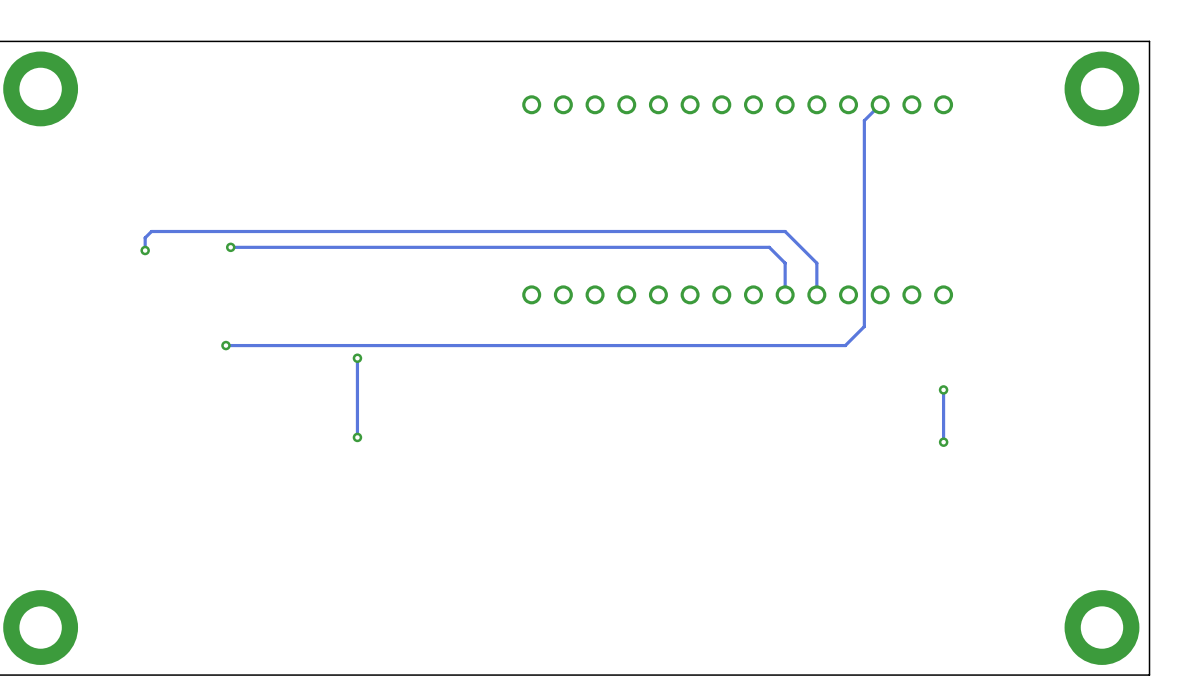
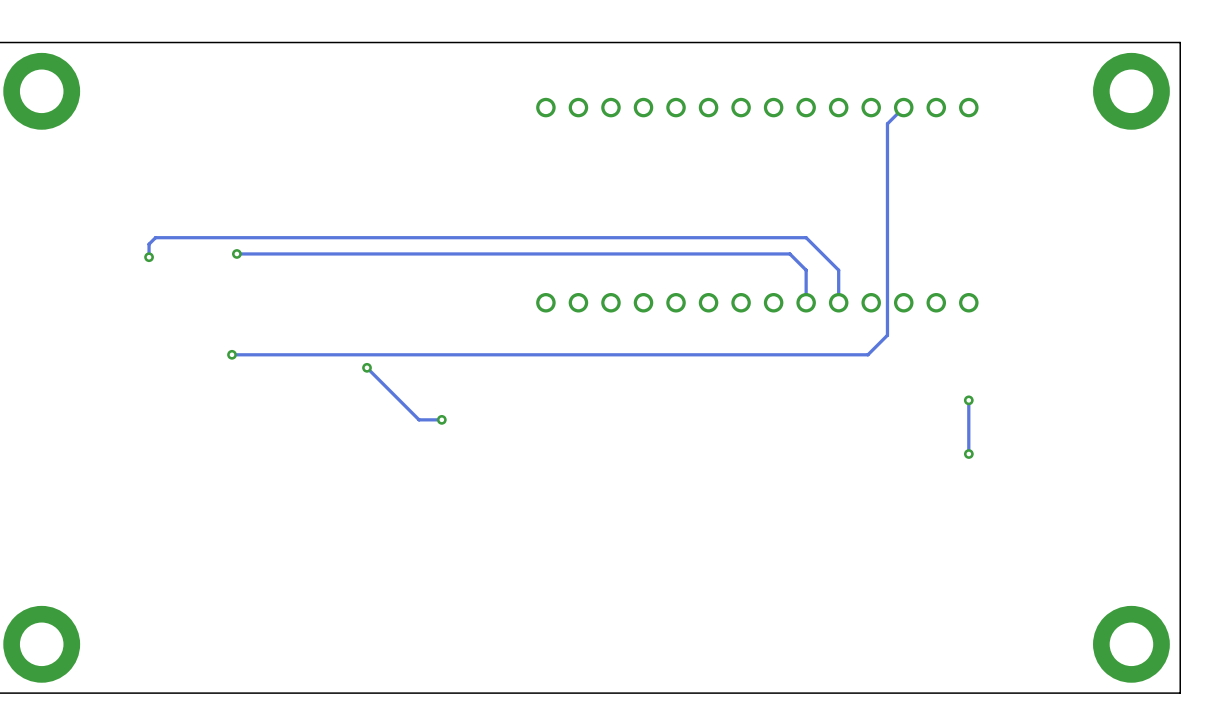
track: (357, 358) (357, 437) -> (367, 367) (419, 419) (441, 419)
via: none -> (441, 419)
via: (357, 437) -> none

